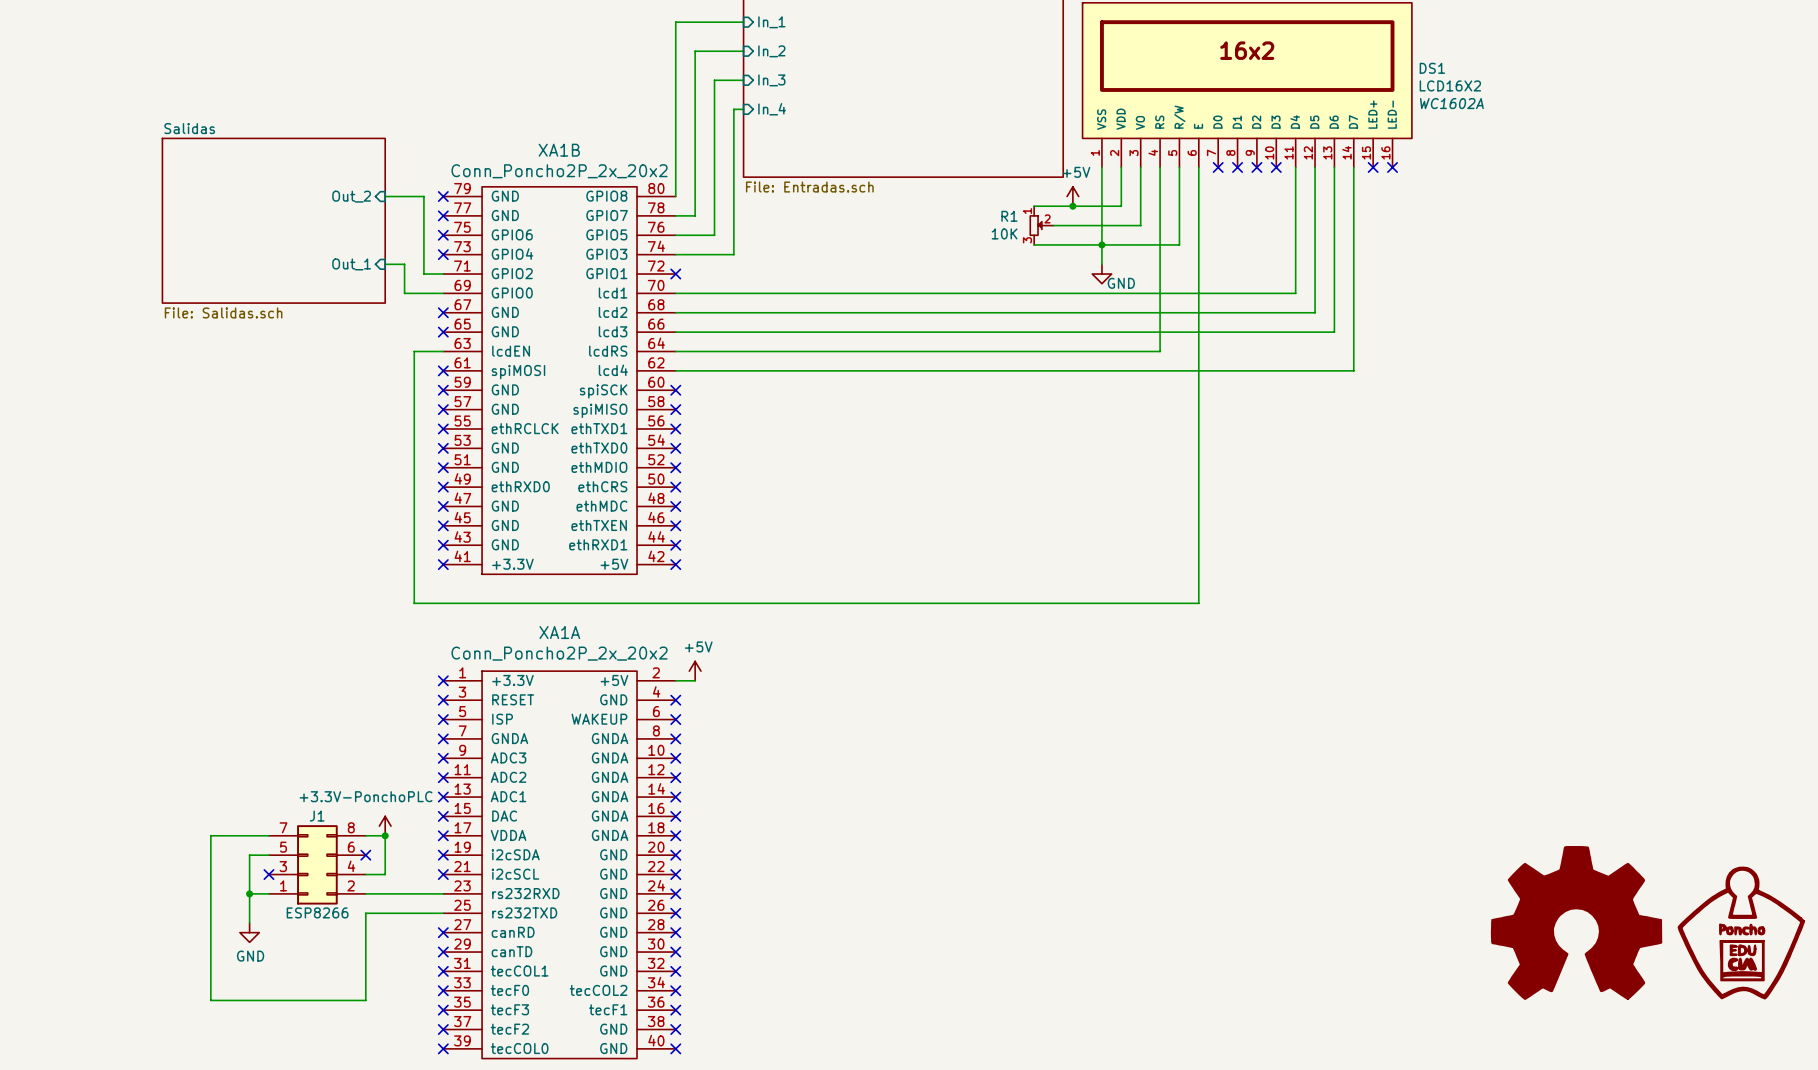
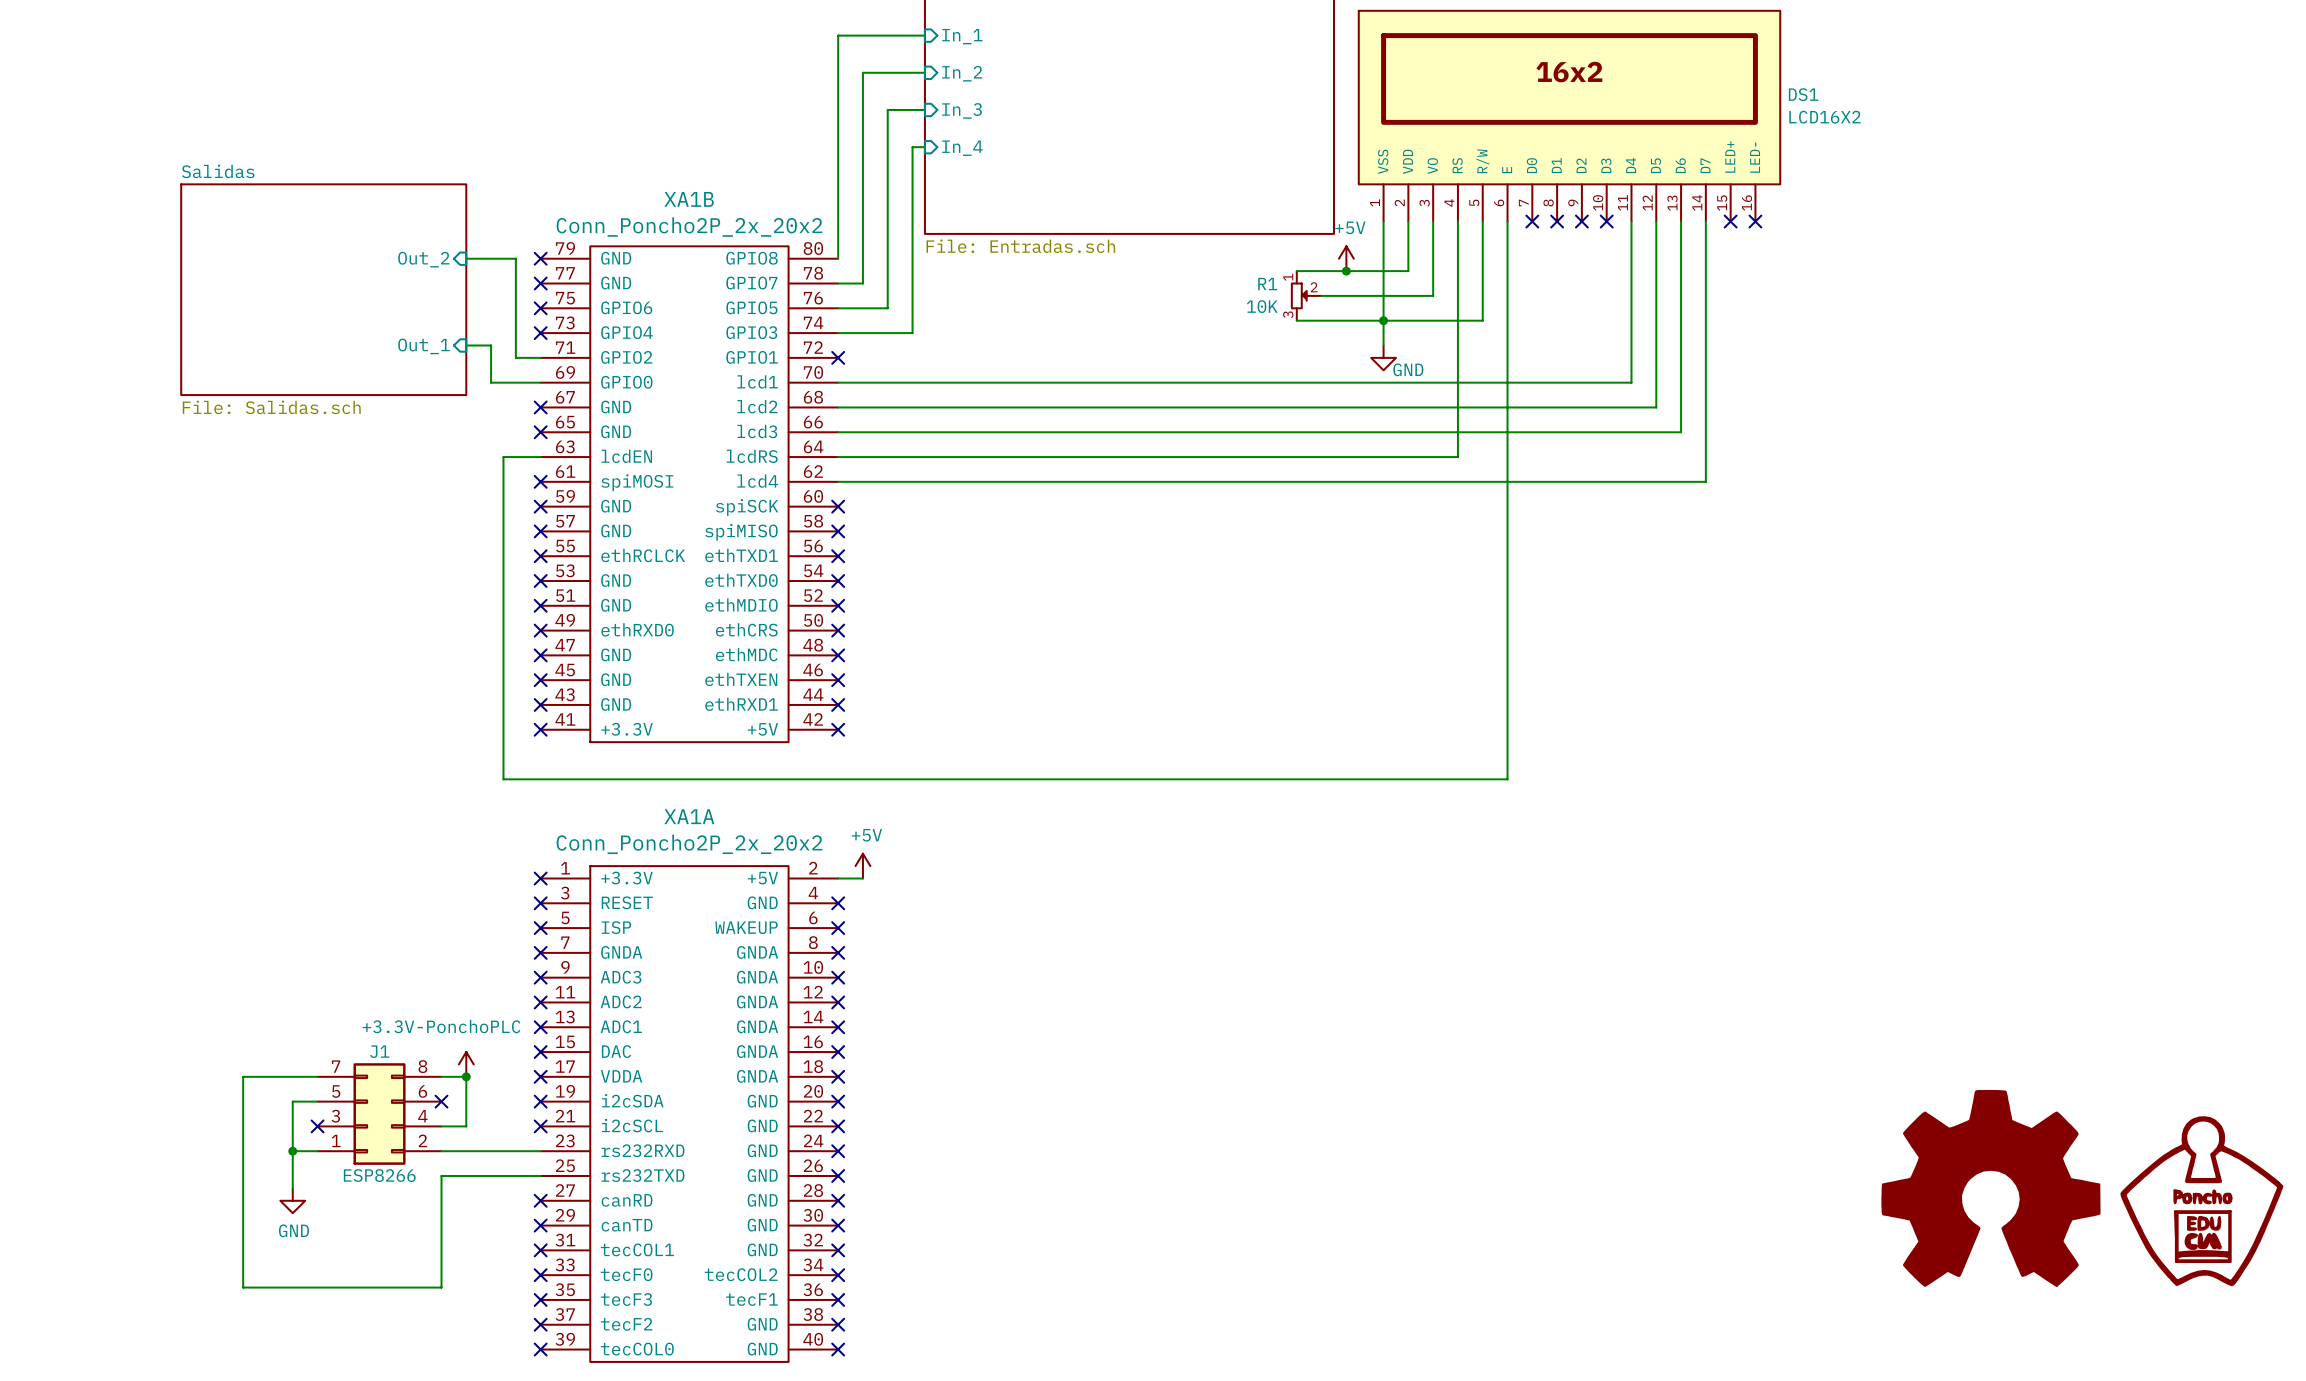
DS1 text: WC1602A (1451, 103) -> none

